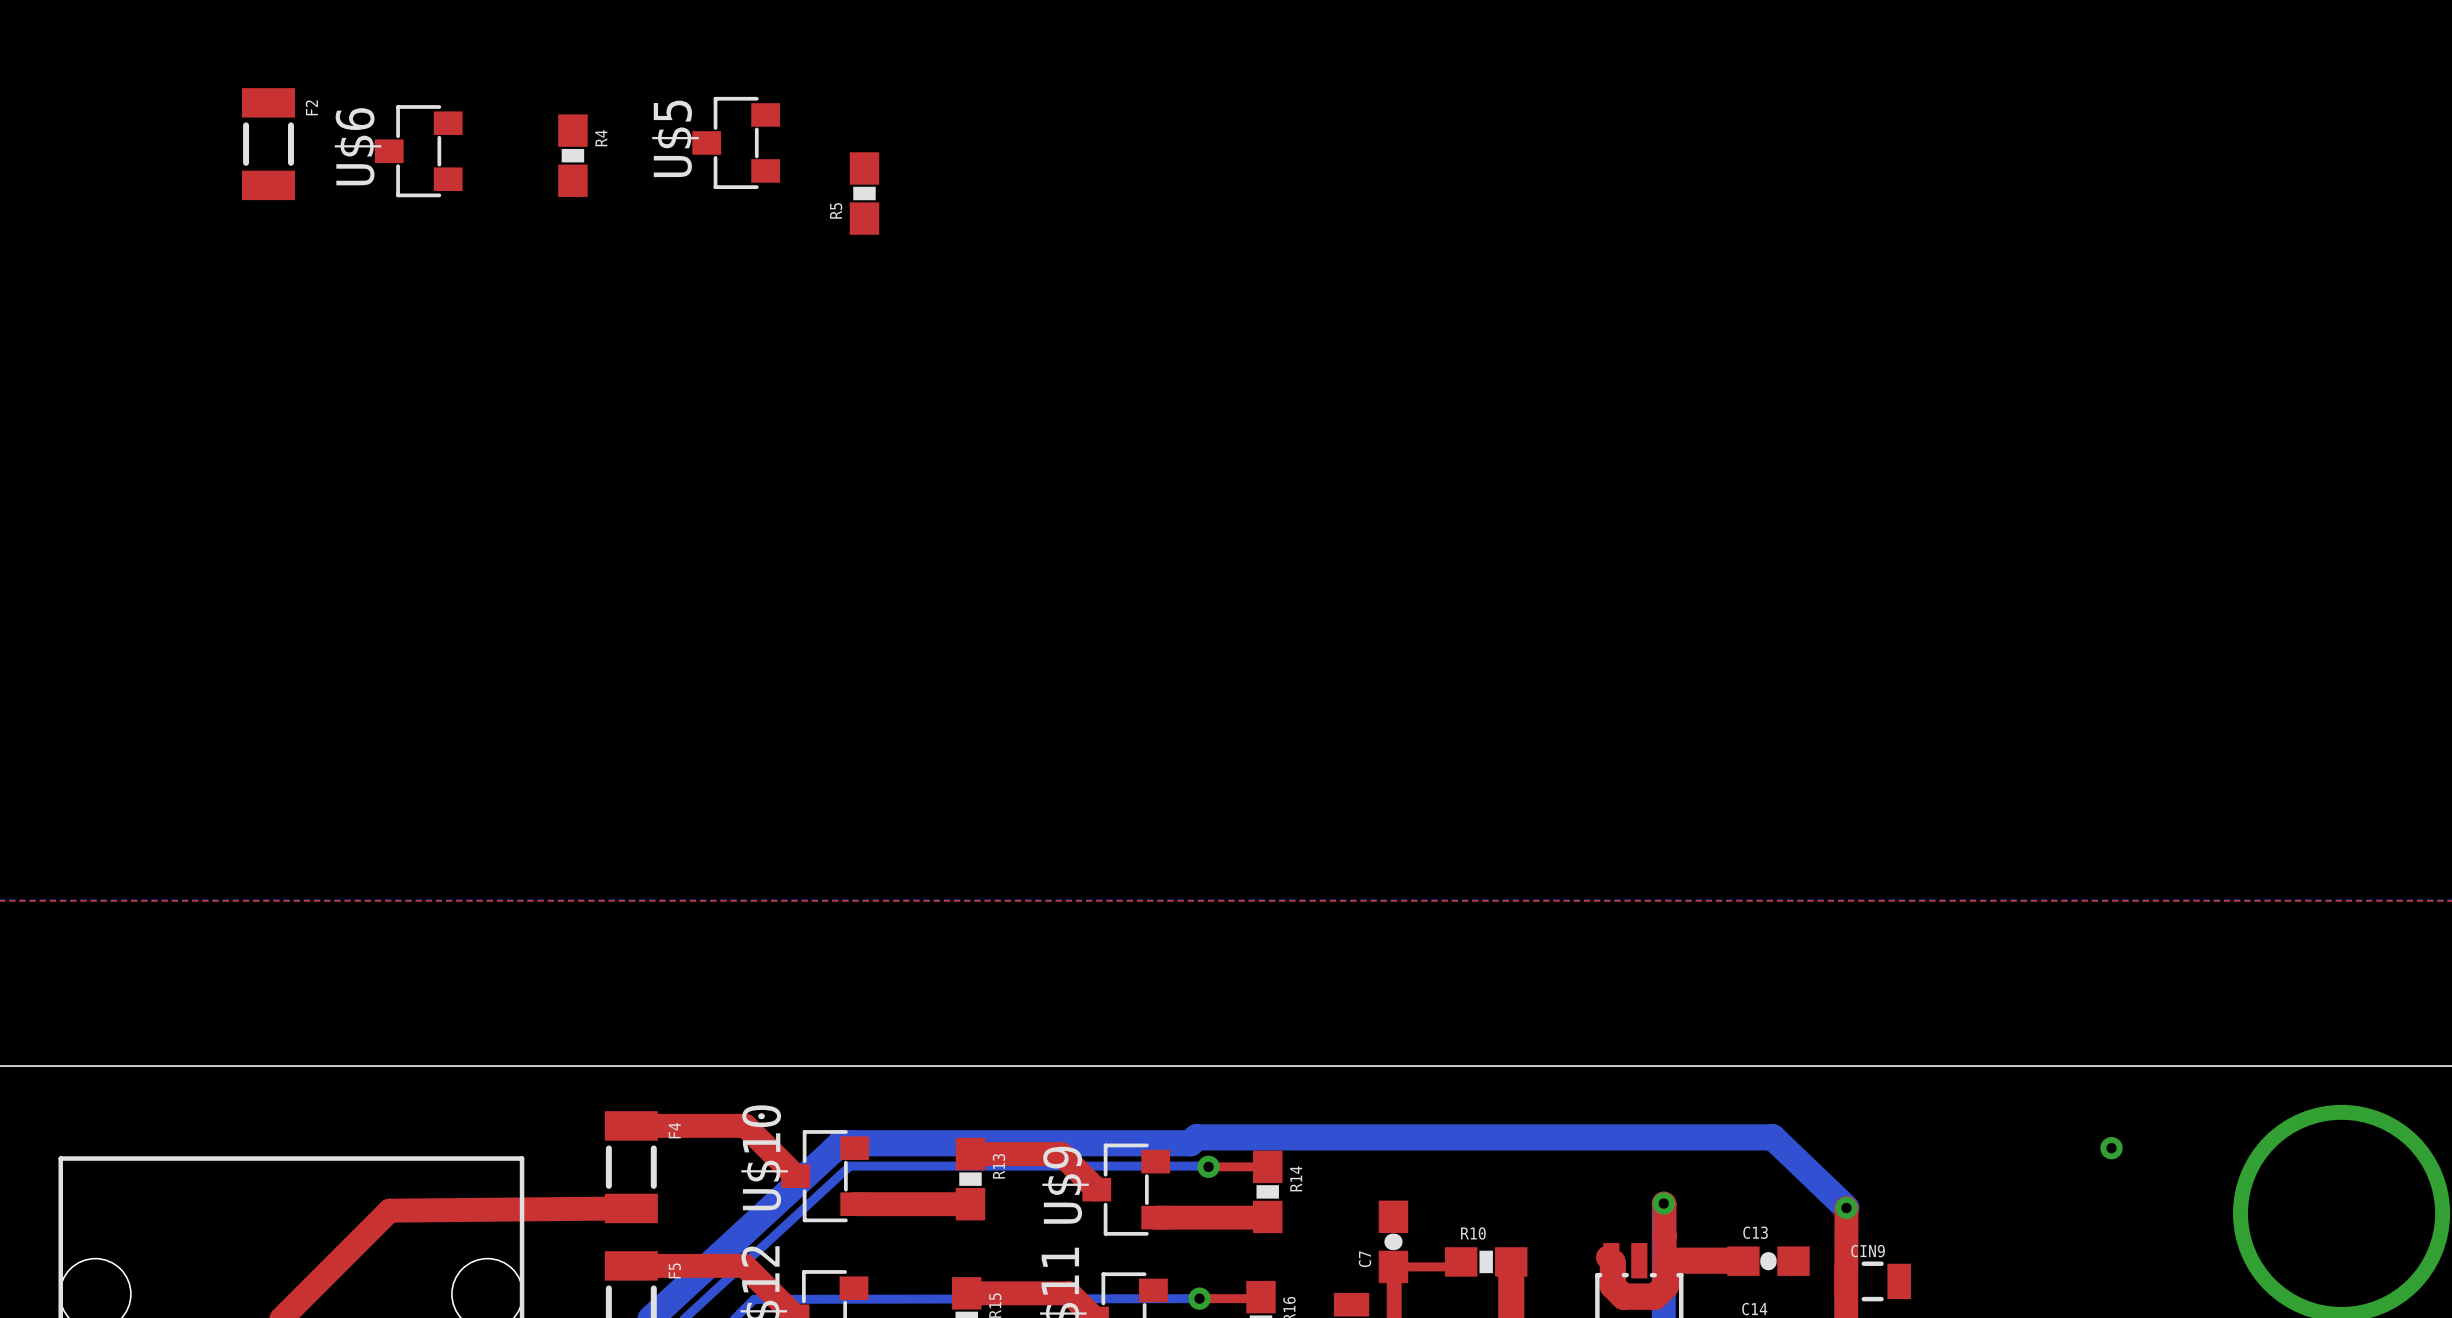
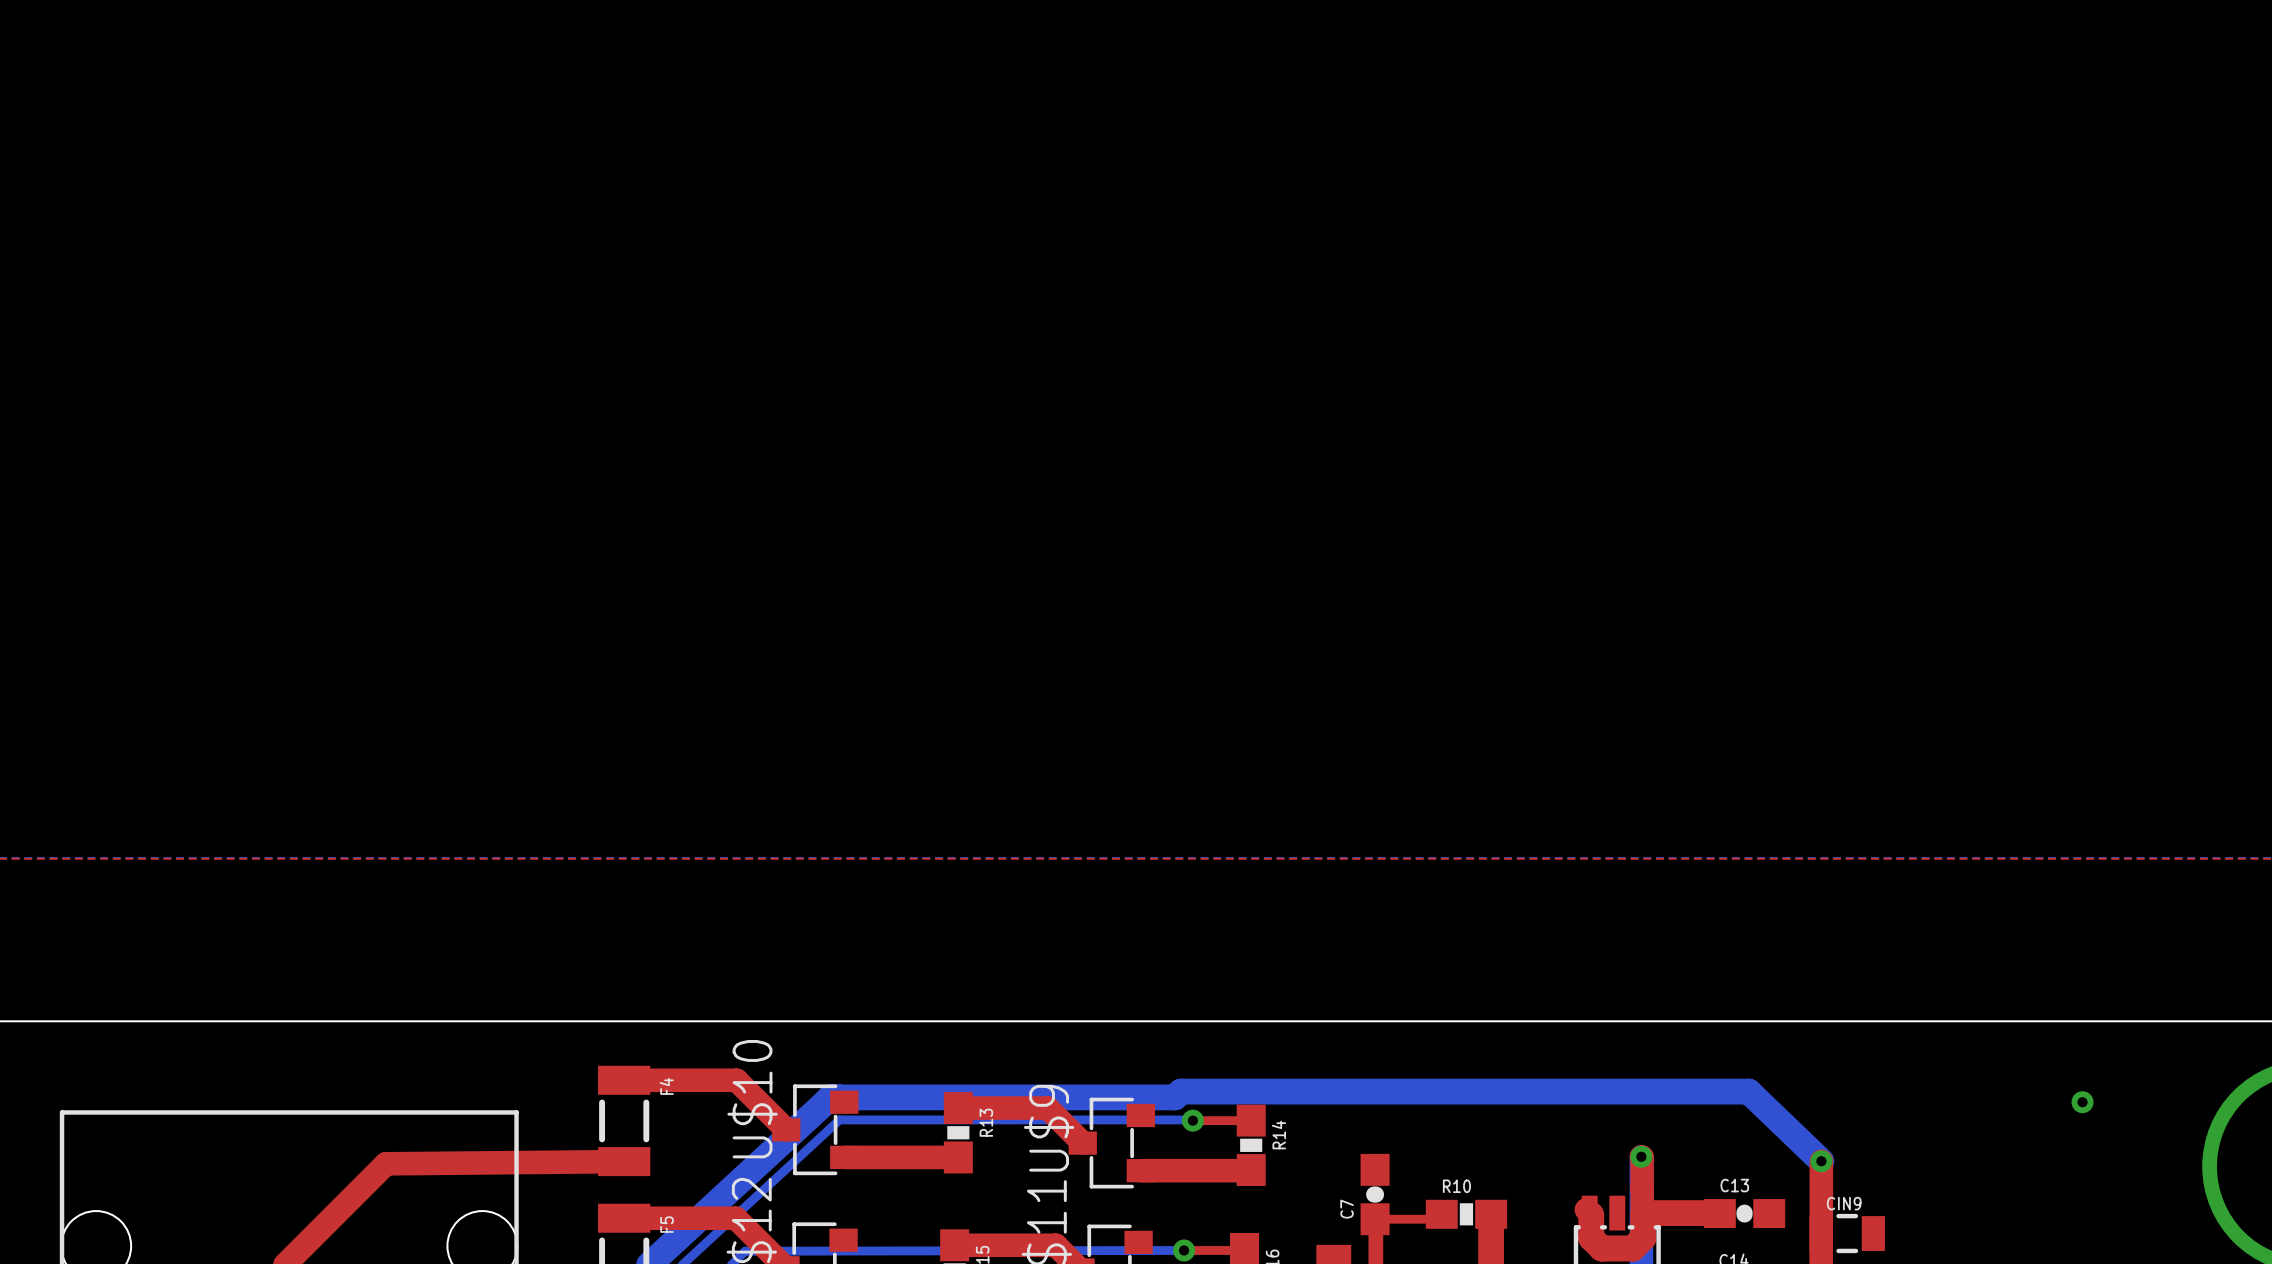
U$5: (736, 142) -> none
F2: (268, 144) -> none
U$6: (418, 151) -> none
R4: (572, 155) -> none
R5: (864, 193) -> none

